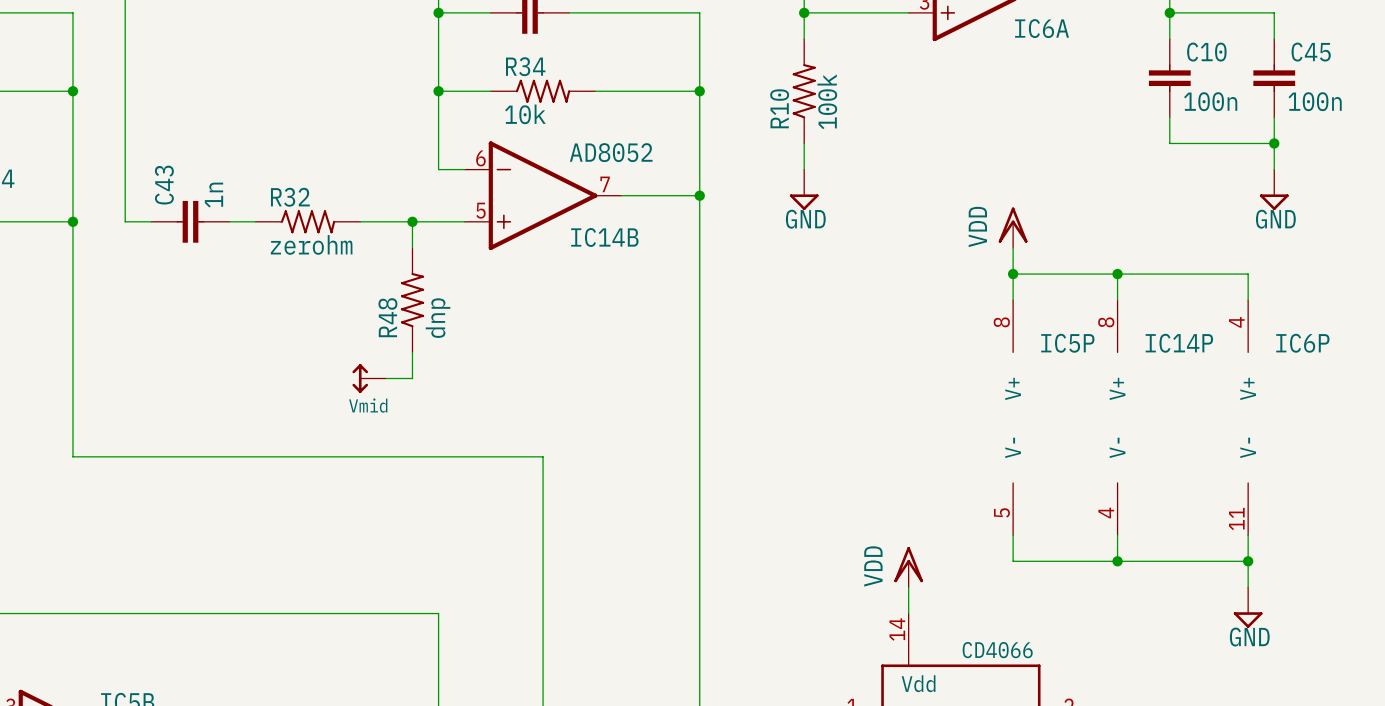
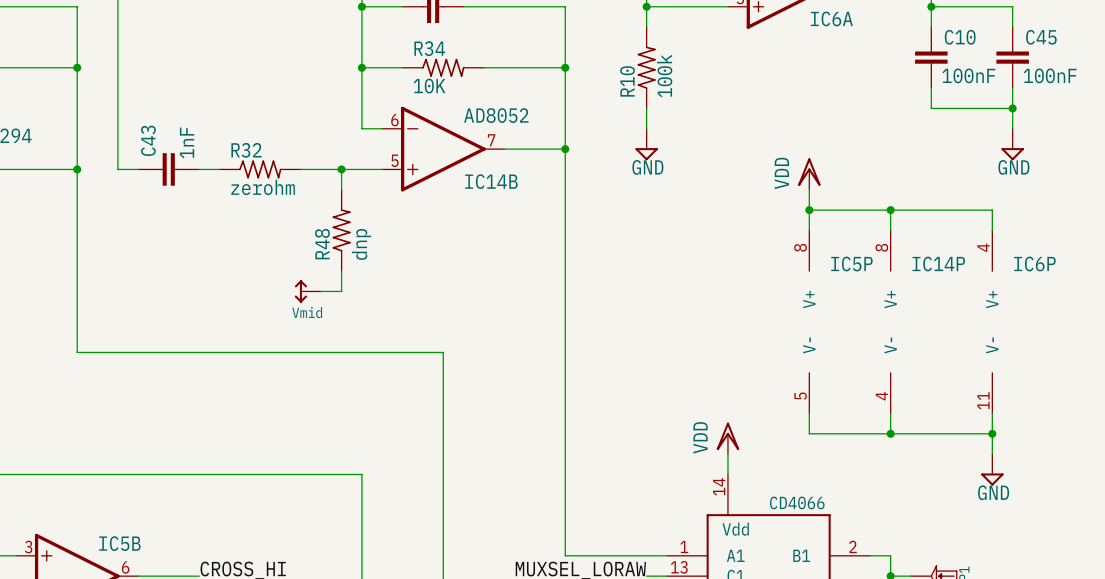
C10 value: 100n (1210, 101) -> 100nF (968, 75)
C45 value: 100n (1315, 101) -> 100nF (1050, 75)
R34 value: 10k (525, 114) -> 10K (429, 86)
C43 value: 1n (214, 195) -> 1nF (187, 142)

